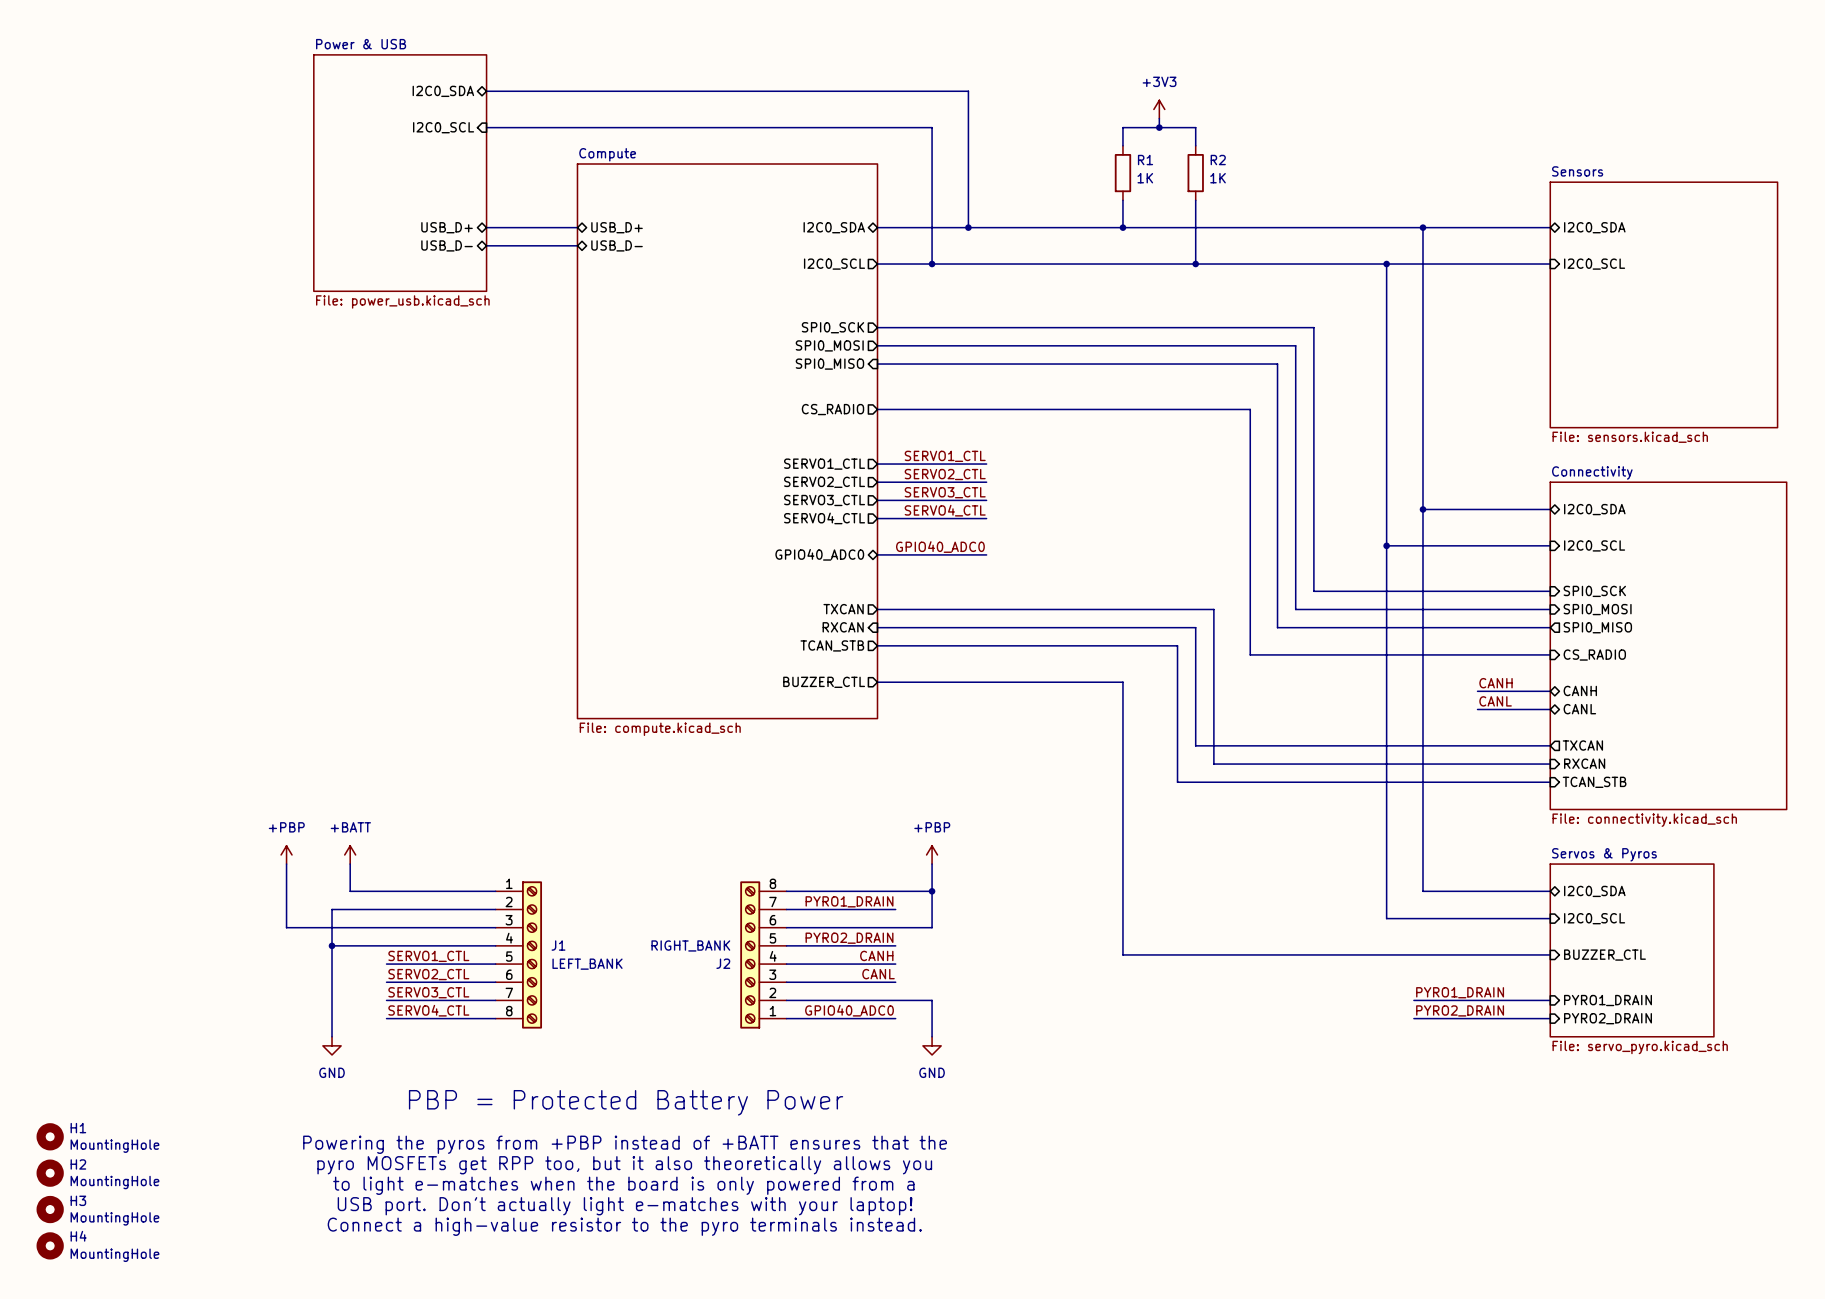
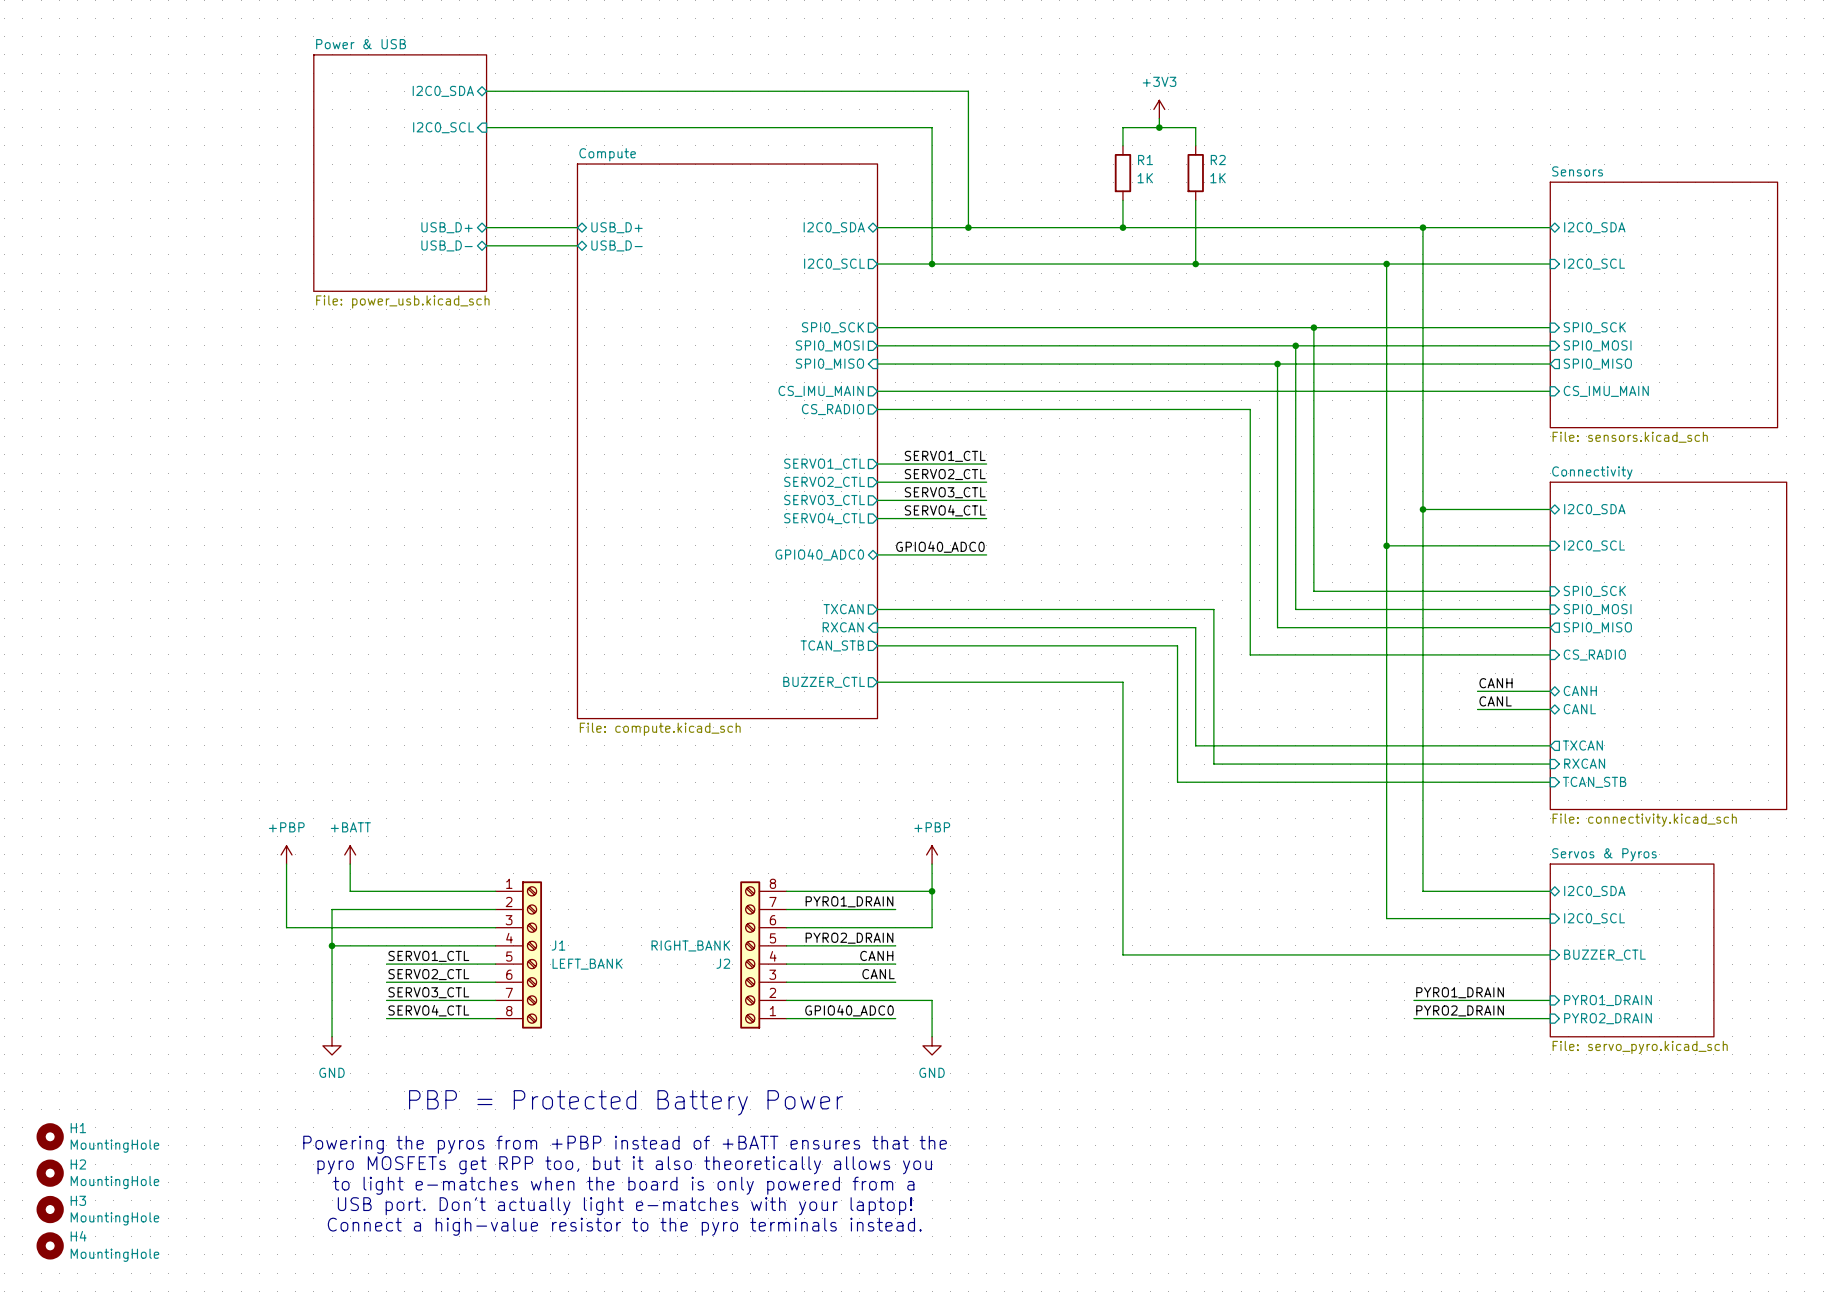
wire: none -> (1313, 327) (1550, 327)
junction: none -> (1313, 327)
sheet pin: none -> SPI0_SCK (1594, 327)
wire: none -> (1295, 345) (1550, 345)
junction: none -> (1295, 345)
sheet pin: none -> SPI0_MOSI (1597, 345)
wire: none -> (1277, 364) (1550, 364)
junction: none -> (1277, 364)
sheet pin: none -> SPI0_MISO (1597, 364)
sheet pin: none -> CS_IMU_MAIN (821, 391)
wire: none -> (877, 391) (1550, 391)
sheet pin: none -> CS_IMU_MAIN (1606, 391)

